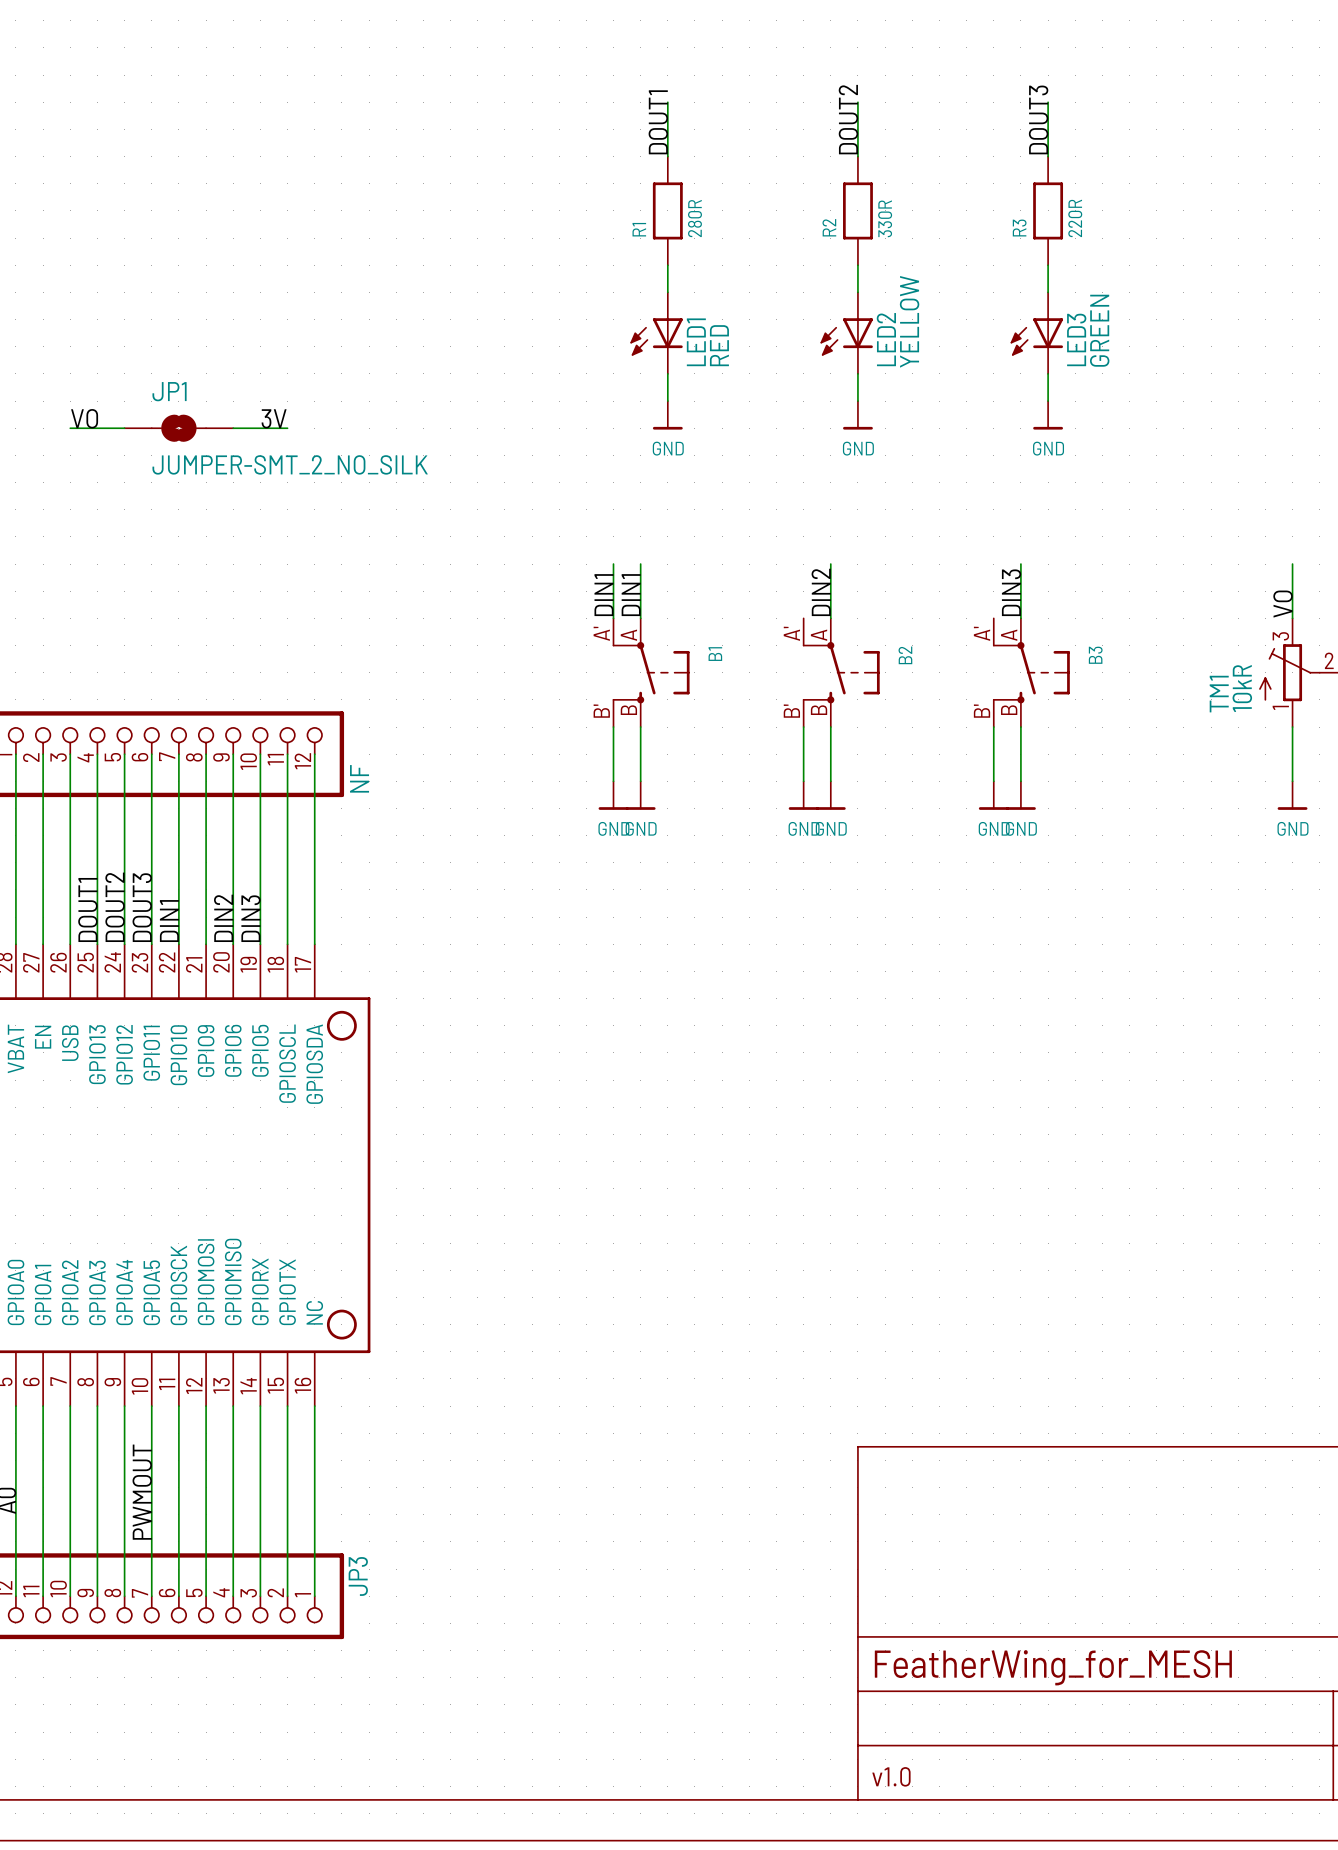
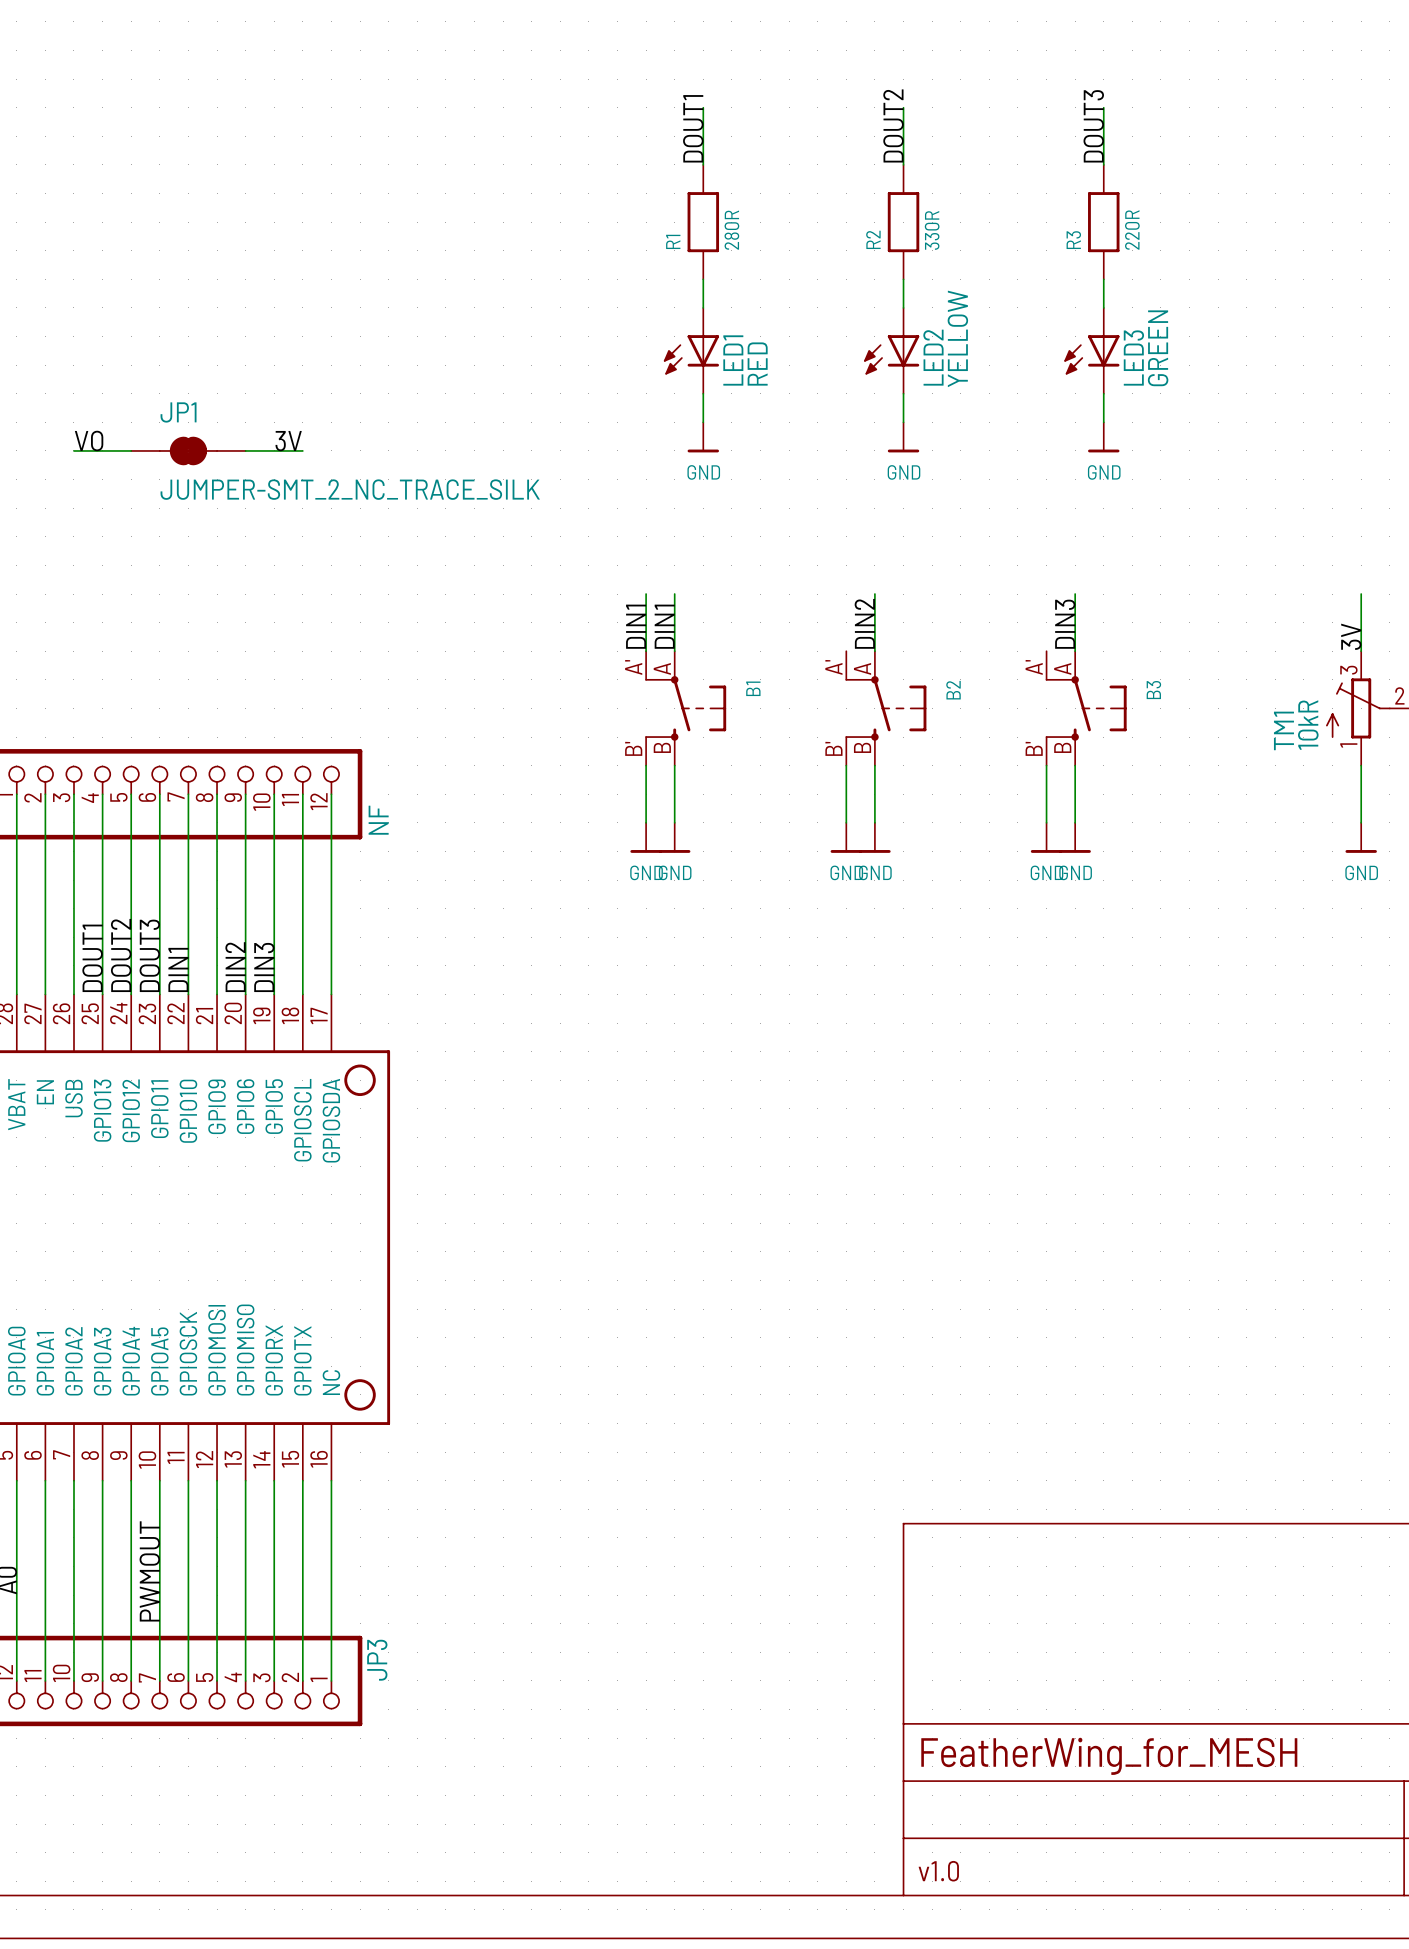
JP1 symbol: [124, 414, 234, 442] -> [131, 436, 246, 466]
JP1 value: JUMPER-SMT_2_NO_SILK (290, 464) -> JUMPER-SMT_2_NC_TRACE_SILK (350, 489)
label: VO (1283, 604) -> 3V (1351, 636)

